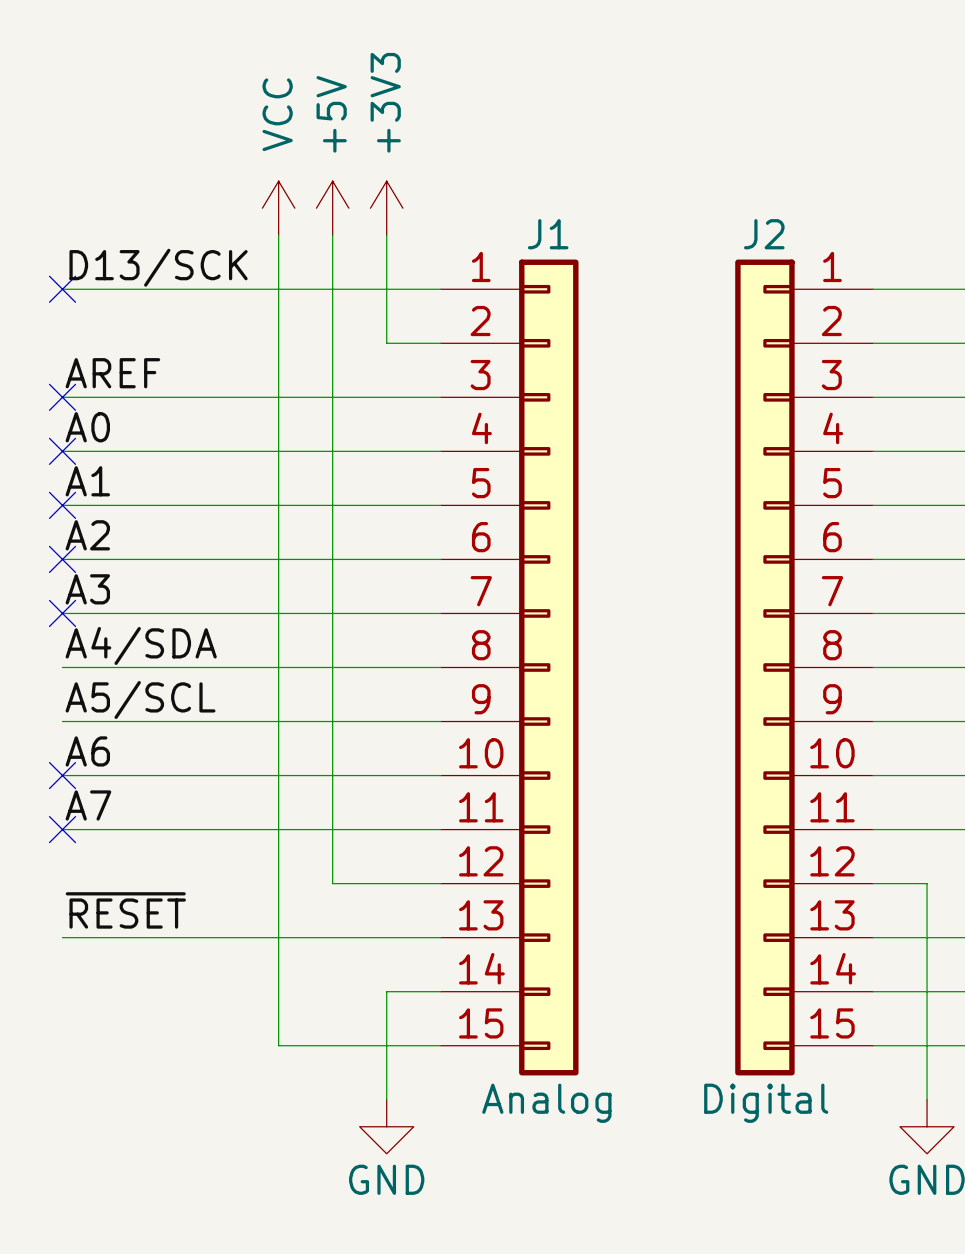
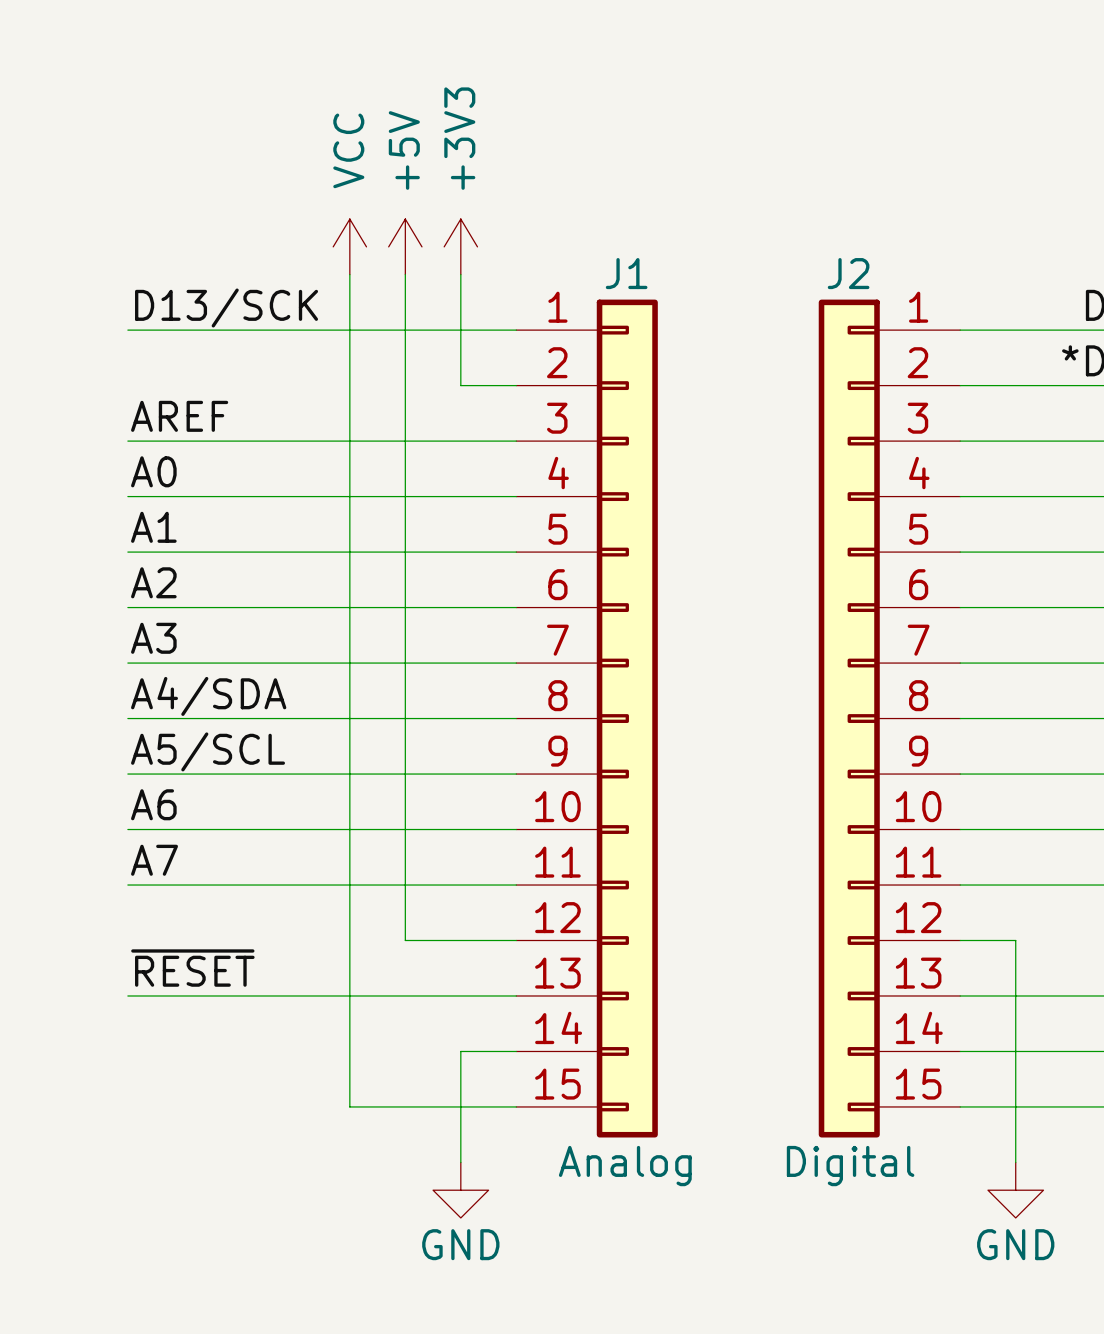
no-connect mark: (62, 289) -> none
no-connect mark: (62, 397) -> none
no-connect mark: (62, 451) -> none
no-connect mark: (62, 505) -> none
no-connect mark: (62, 559) -> none
no-connect mark: (62, 613) -> none
no-connect mark: (62, 775) -> none
no-connect mark: (62, 829) -> none

